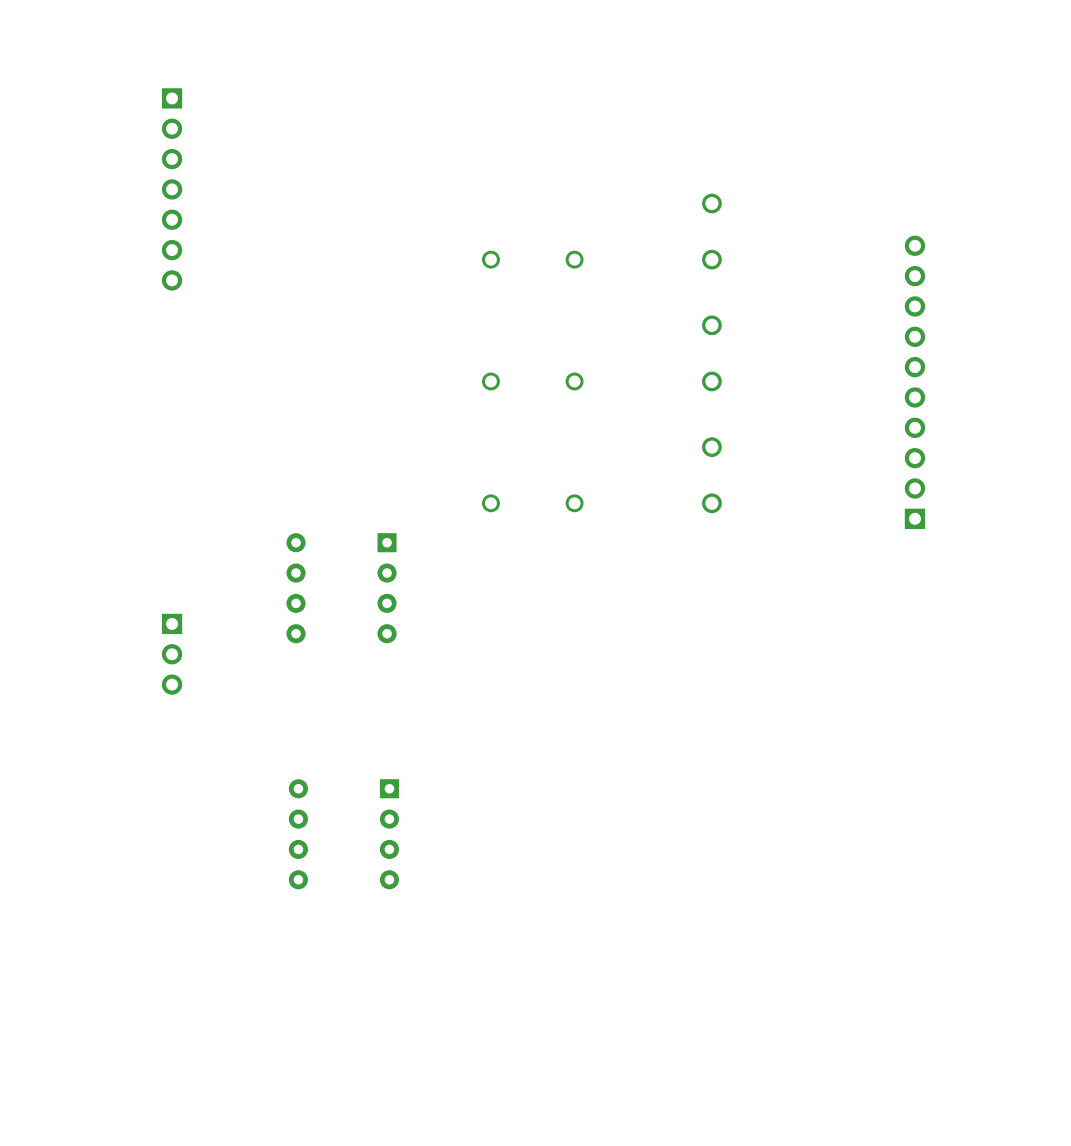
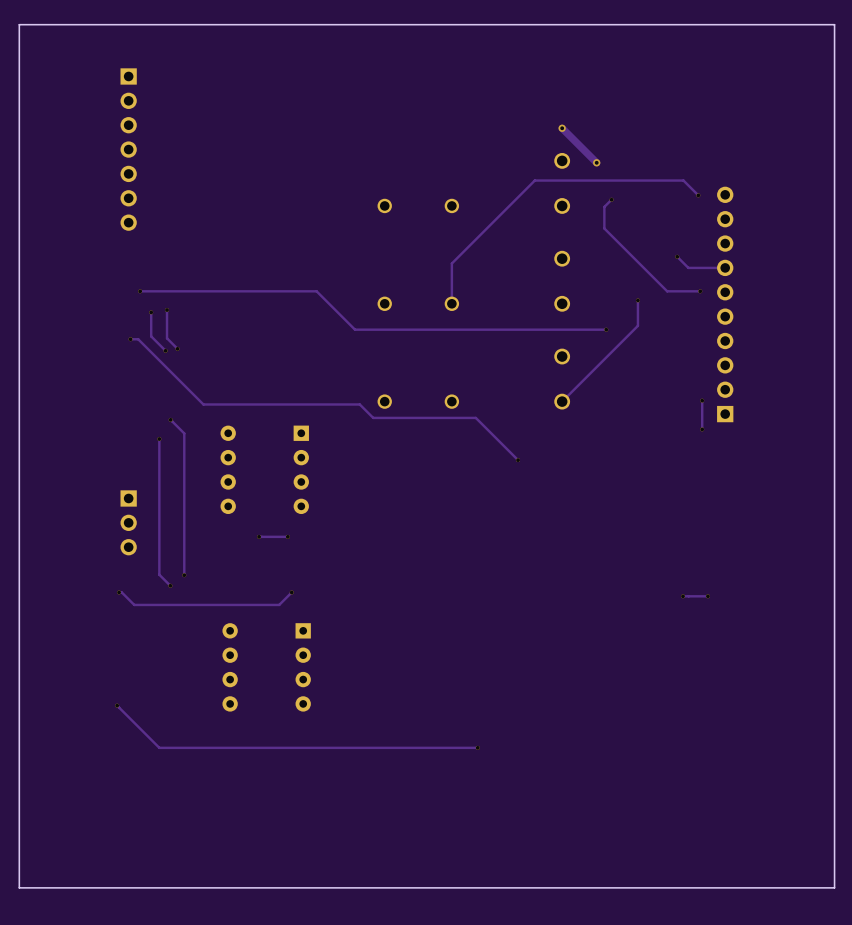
board edge: none -> (834, 24) (19, 24) (19, 887) (834, 887) (834, 24)
track: none -> (562, 128) (596, 162)
via: none -> (562, 128)
via: none -> (596, 162)
track: none -> (698, 195) (683, 180) (534, 180) (451, 263) (451, 303)
via: none -> (698, 195)
track: none -> (611, 199) (604, 206) (604, 228) (667, 291) (700, 291)
via: none -> (611, 199)
track: none -> (677, 256) (688, 267) (725, 267)
via: none -> (677, 256)
track: none -> (140, 291) (316, 291) (355, 329) (606, 329)
via: none -> (140, 291)
via: none -> (700, 291)
track: none -> (637, 300) (637, 325) (562, 401)
via: none -> (637, 300)
track: none -> (167, 310) (167, 338) (177, 348)
via: none -> (167, 310)
track: none -> (151, 312) (151, 336) (165, 350)
via: none -> (151, 312)
via: none -> (606, 329)
track: none -> (130, 339) (138, 339) (203, 404) (359, 404) (373, 417) (475, 417) (518, 460)
via: none -> (130, 339)
via: none -> (177, 348)
via: none -> (165, 350)
track: none -> (702, 400) (702, 429)
via: none -> (702, 400)
track: none -> (170, 419) (184, 433) (184, 575)
via: none -> (170, 419)
via: none -> (702, 429)
track: none -> (159, 439) (159, 574) (170, 585)
via: none -> (159, 439)
via: none -> (518, 460)
via: none -> (259, 536)
track: none -> (287, 536) (259, 536)
via: none -> (287, 536)
via: none -> (184, 575)
via: none -> (170, 585)
via: none -> (119, 592)
track: none -> (291, 592) (279, 604) (134, 604) (121, 592) (119, 592)
via: none -> (291, 592)
via: none -> (683, 596)
track: none -> (707, 596) (683, 596)
via: none -> (707, 596)
track: none -> (117, 705) (159, 747) (477, 747)
via: none -> (117, 705)
via: none -> (477, 747)

